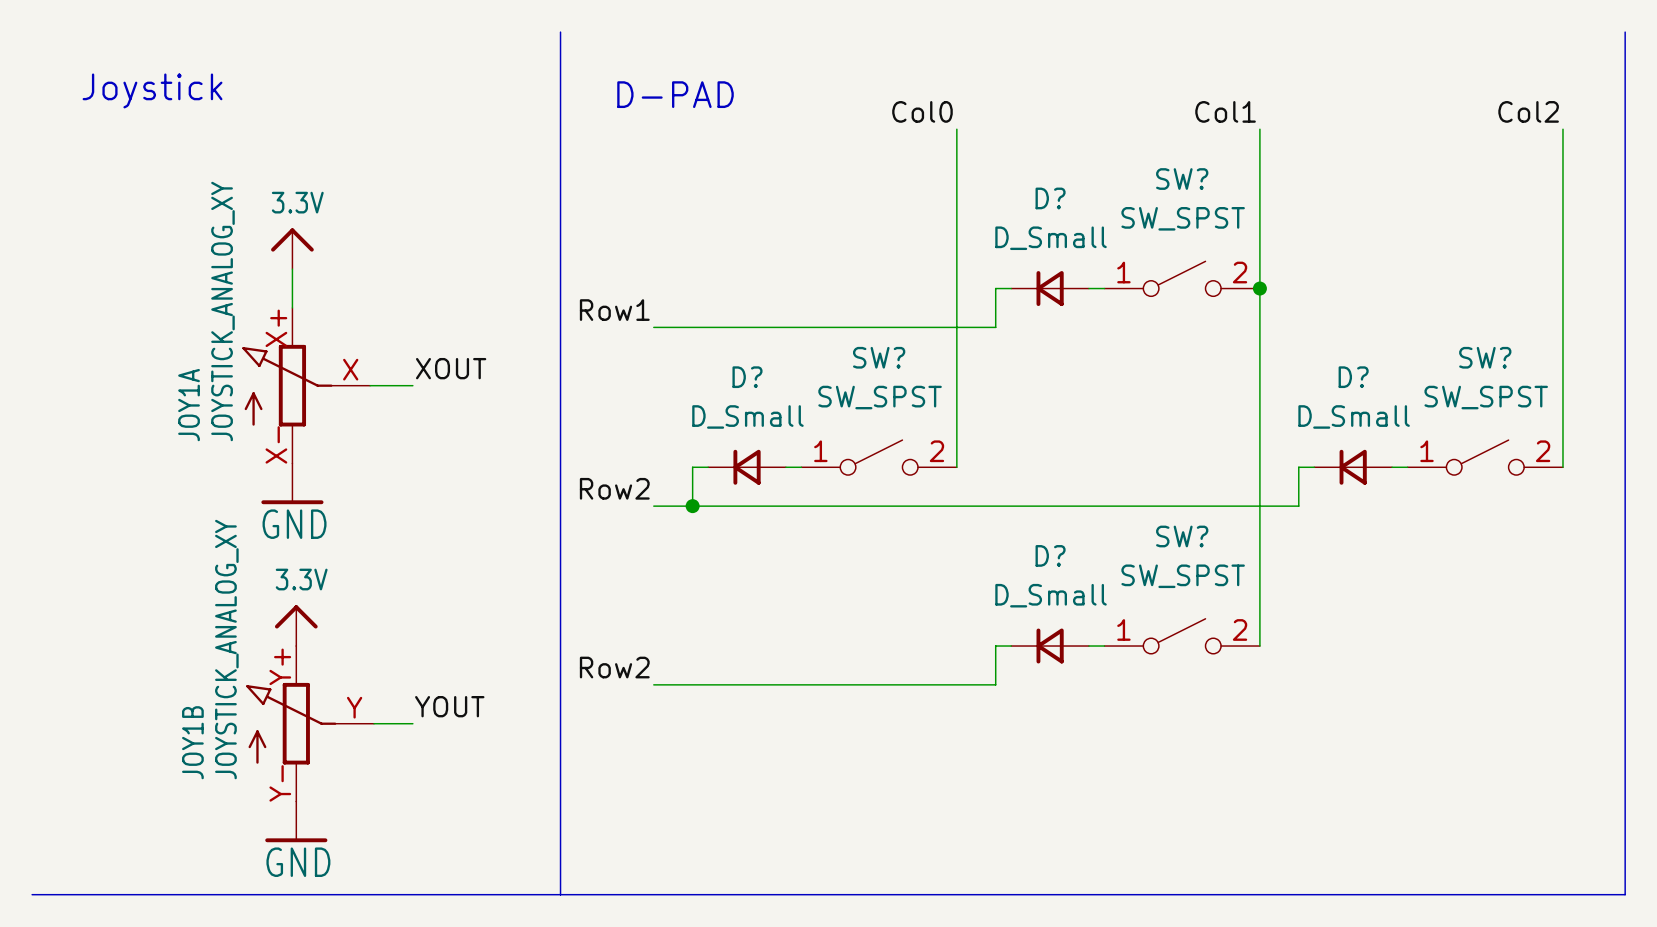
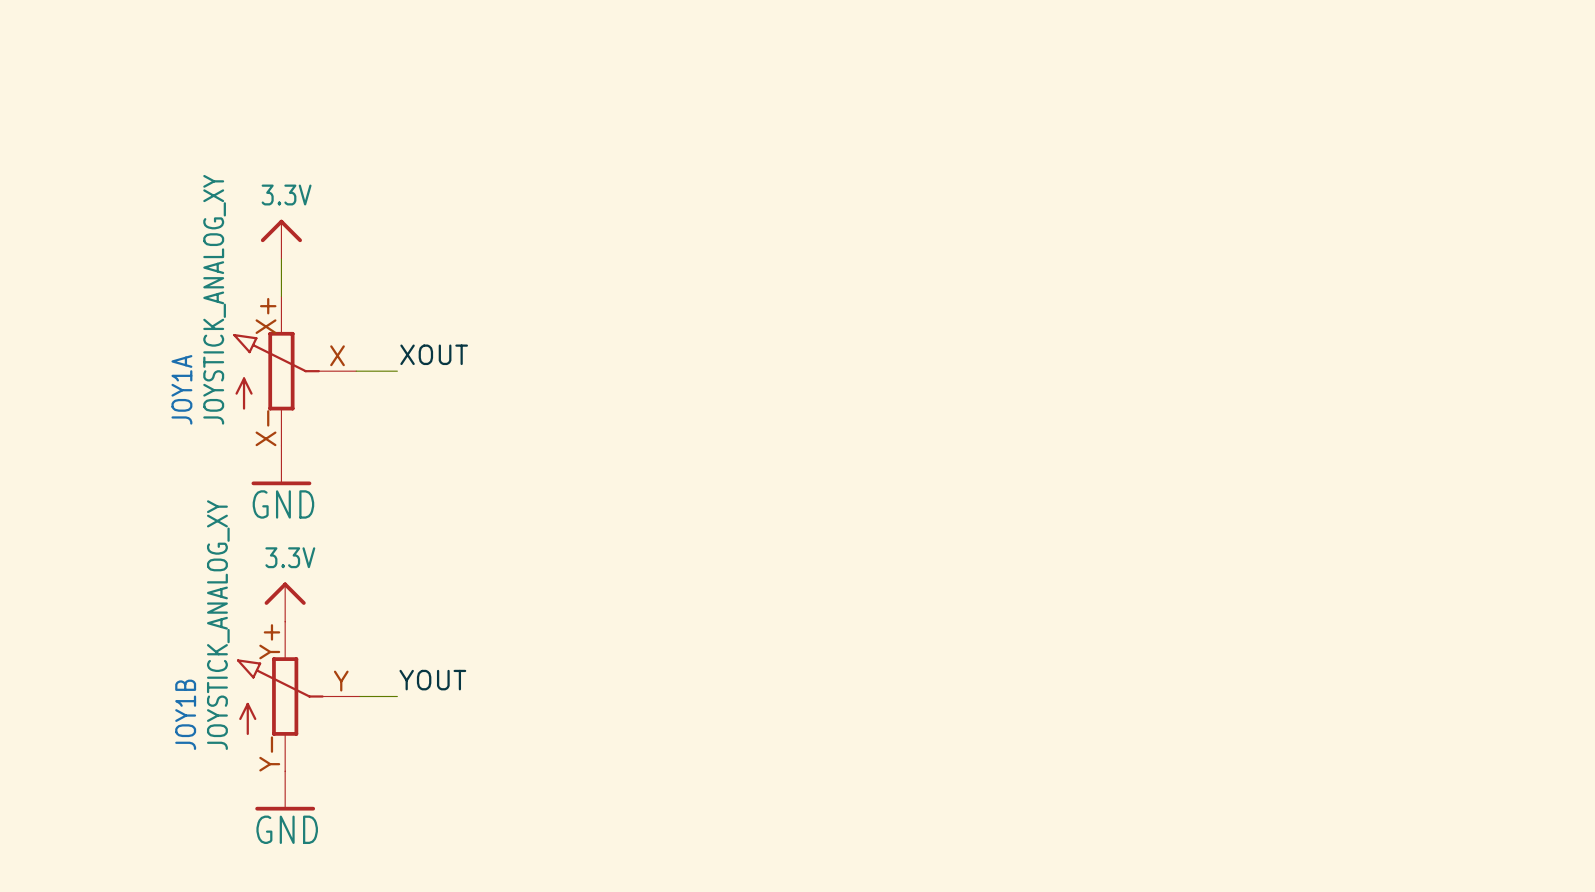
line: (560, 32) (560, 894) -> none
line: (1625, 32) (1625, 894) (32, 894) -> none
text: Joystick (152, 90) -> none
text: D-PAD (675, 94) -> none
label: Col0 (922, 111) -> none
label: Col1 (1225, 111) -> none
label: Col2 (1528, 111) -> none
wire: (956, 129) (956, 467) -> none
wire: (1259, 129) (1259, 646) -> none
wire: (1562, 129) (1562, 467) -> none
SW?: SW_SPST (1182, 278) -> none
wire: (1011, 288) (995, 288) (995, 327) (653, 327) -> none
D?: D_Small (1050, 288) -> none
wire: (1088, 288) (1104, 288) -> none
junction: (1259, 288) -> none
label: Row1 (614, 310) -> none
SW?: SW_SPST (879, 457) -> none
SW?: SW_SPST (1485, 457) -> none
wire: (708, 467) (692, 467) (692, 506) -> none
D?: D_Small (747, 467) -> none
wire: (785, 467) (801, 467) -> none
wire: (1314, 467) (1298, 467) (1298, 506) (653, 506) -> none
D?: D_Small (1353, 467) -> none
wire: (1392, 467) (1407, 467) -> none
label: Row2 (614, 488) -> none
junction: (692, 506) -> none
SW?: SW_SPST (1182, 636) -> none
wire: (1011, 646) (995, 646) (995, 684) (653, 684) -> none
D?: D_Small (1050, 646) -> none
wire: (1088, 646) (1104, 646) -> none
label: Row2 (614, 667) -> none

